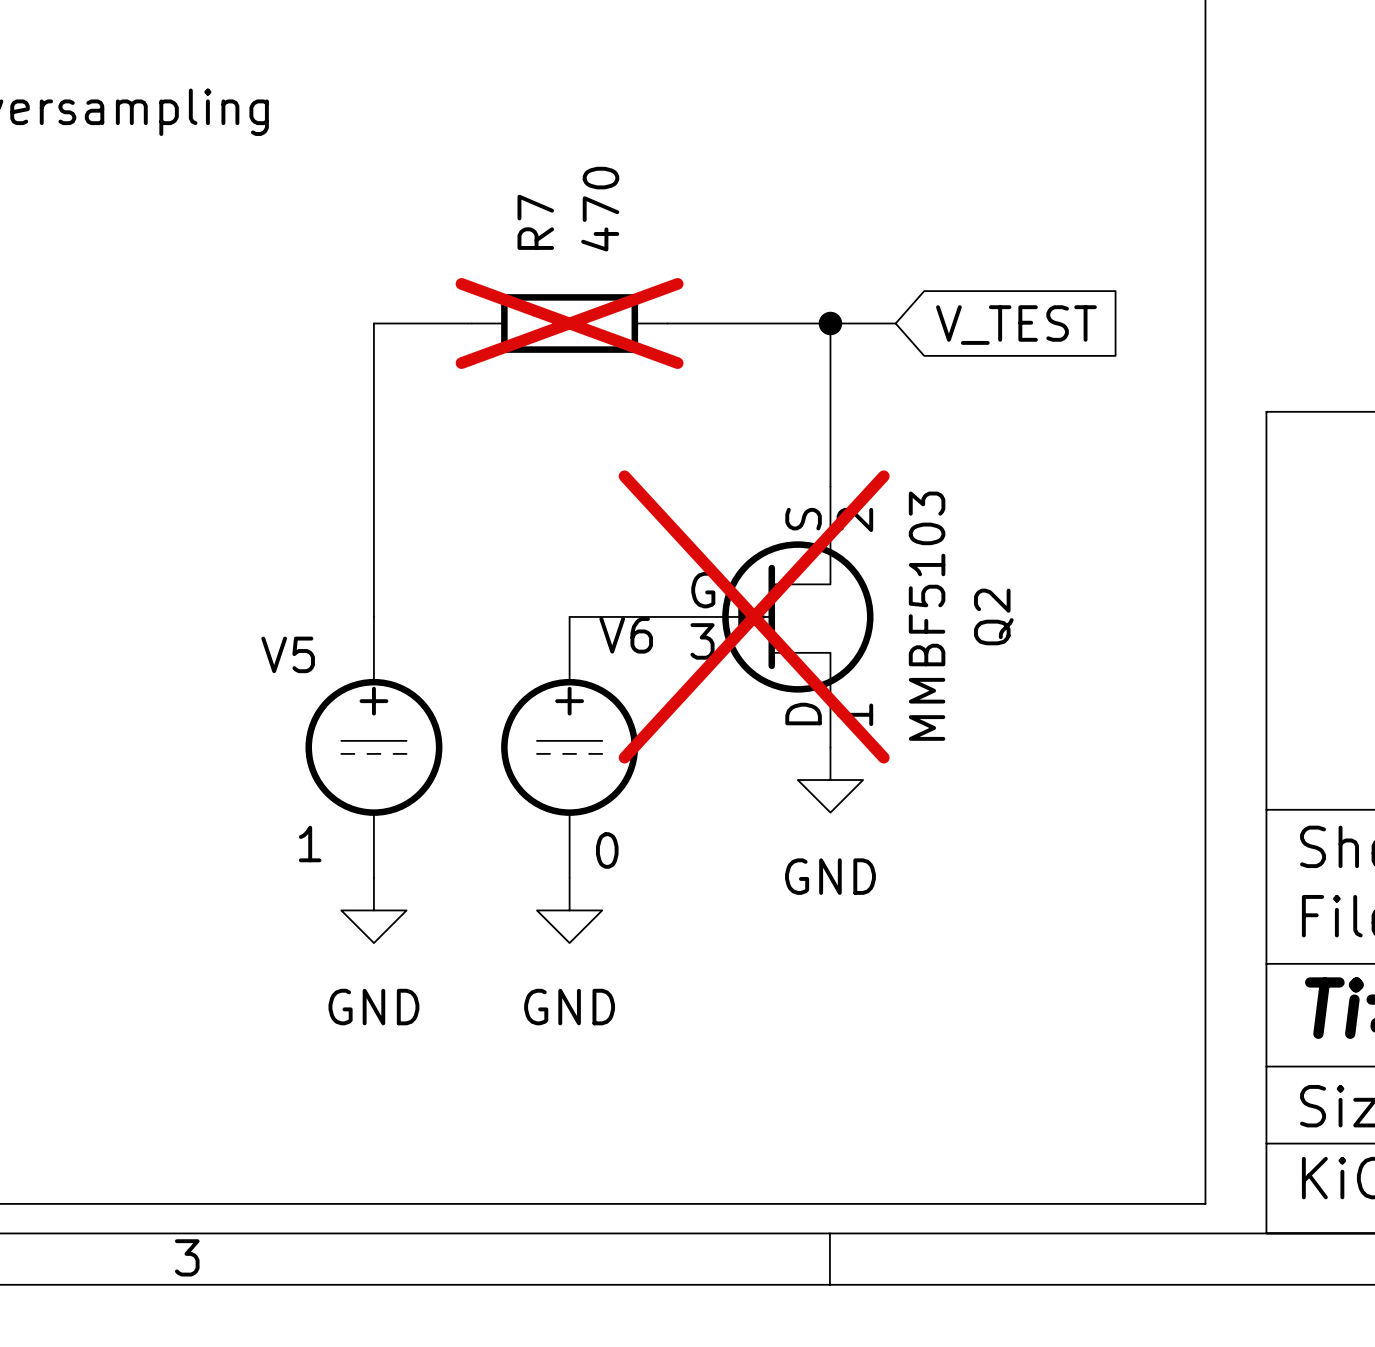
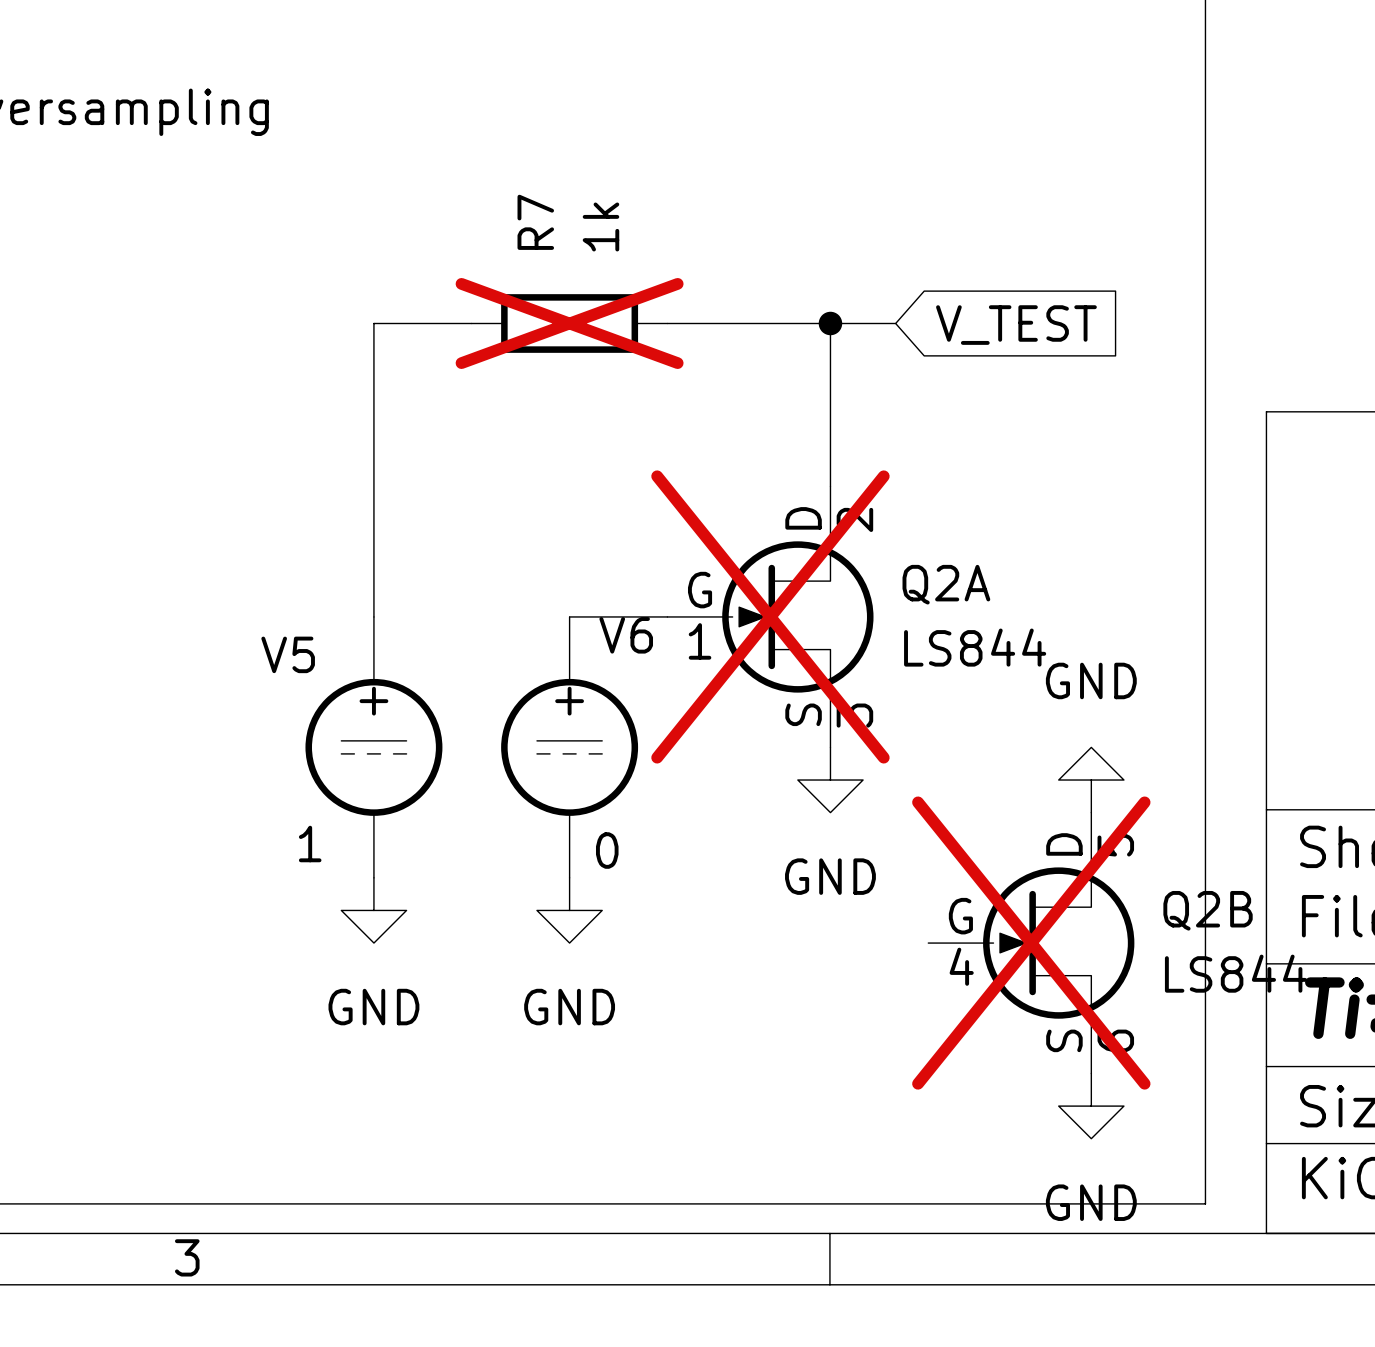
R7 value: 470 (600, 209) -> 1k (600, 226)
Q2: MMBF5103 (754, 616) -> none
Q2A: none -> LS844 (770, 616)
power symbol: none -> GND (1091, 780)
Q2B: none -> LS844 (1031, 943)
power symbol: none -> GND (1091, 1106)

